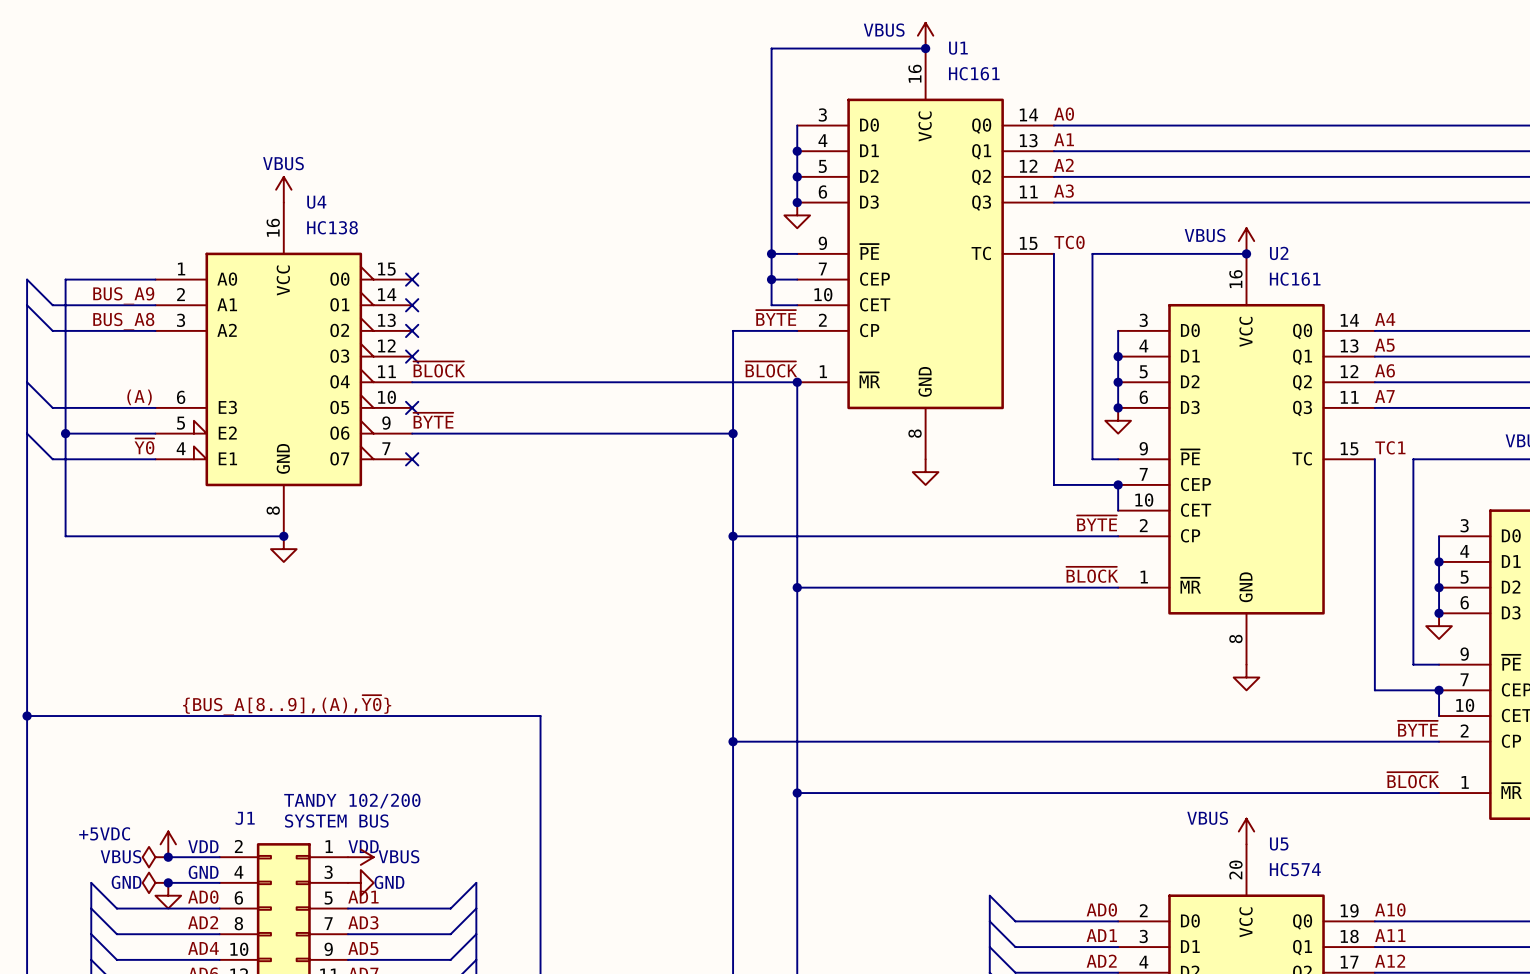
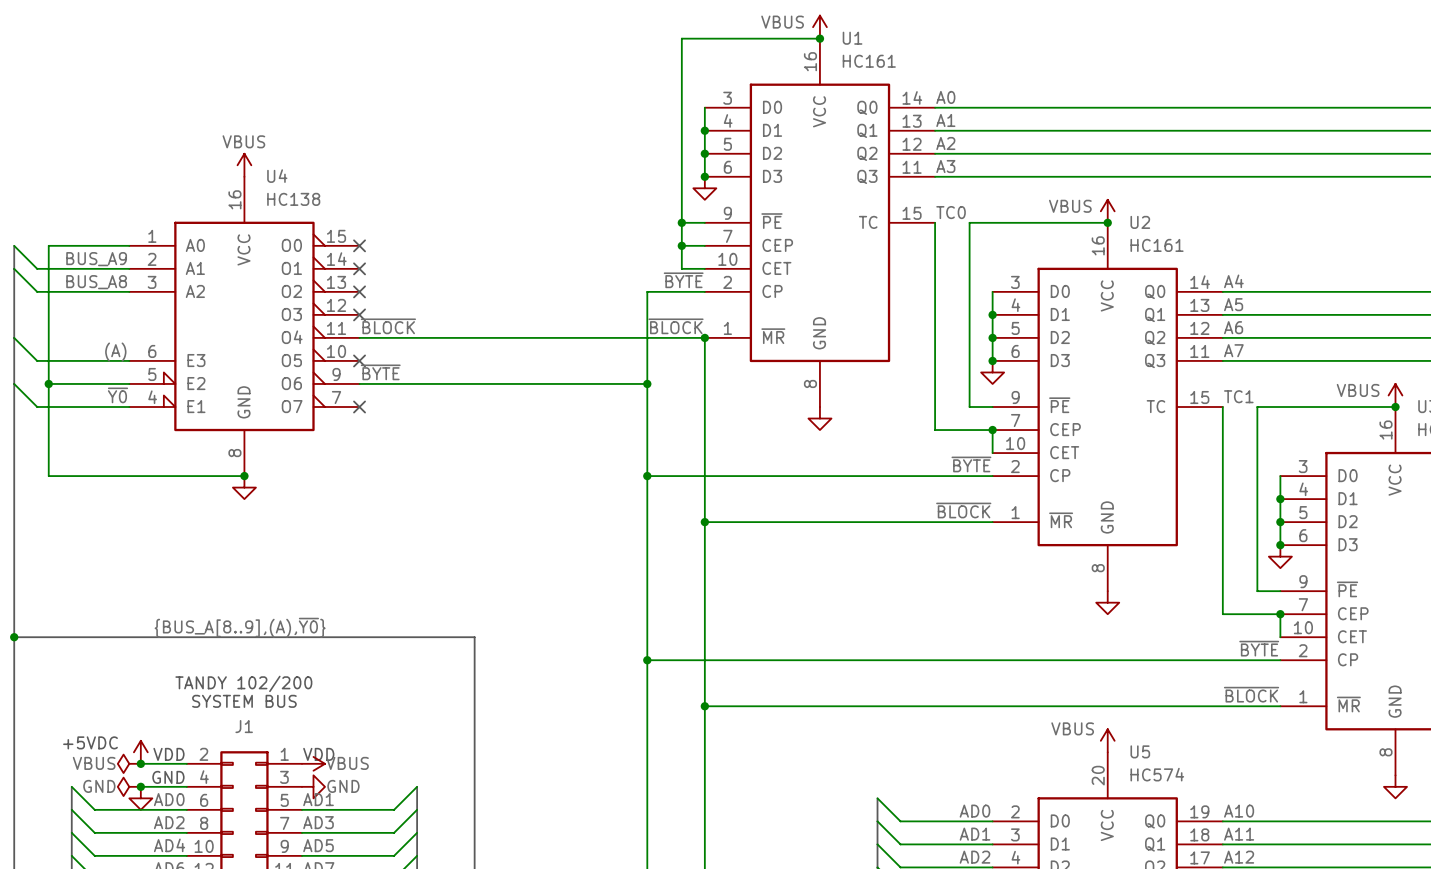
text position: TANDY 102/200 (352, 801) -> TANDY 102/200 (243, 683)
J1 name position: J1 (245, 818) -> J1 (244, 726)
text position: SYSTEM BUS (336, 821) -> SYSTEM BUS (244, 701)

